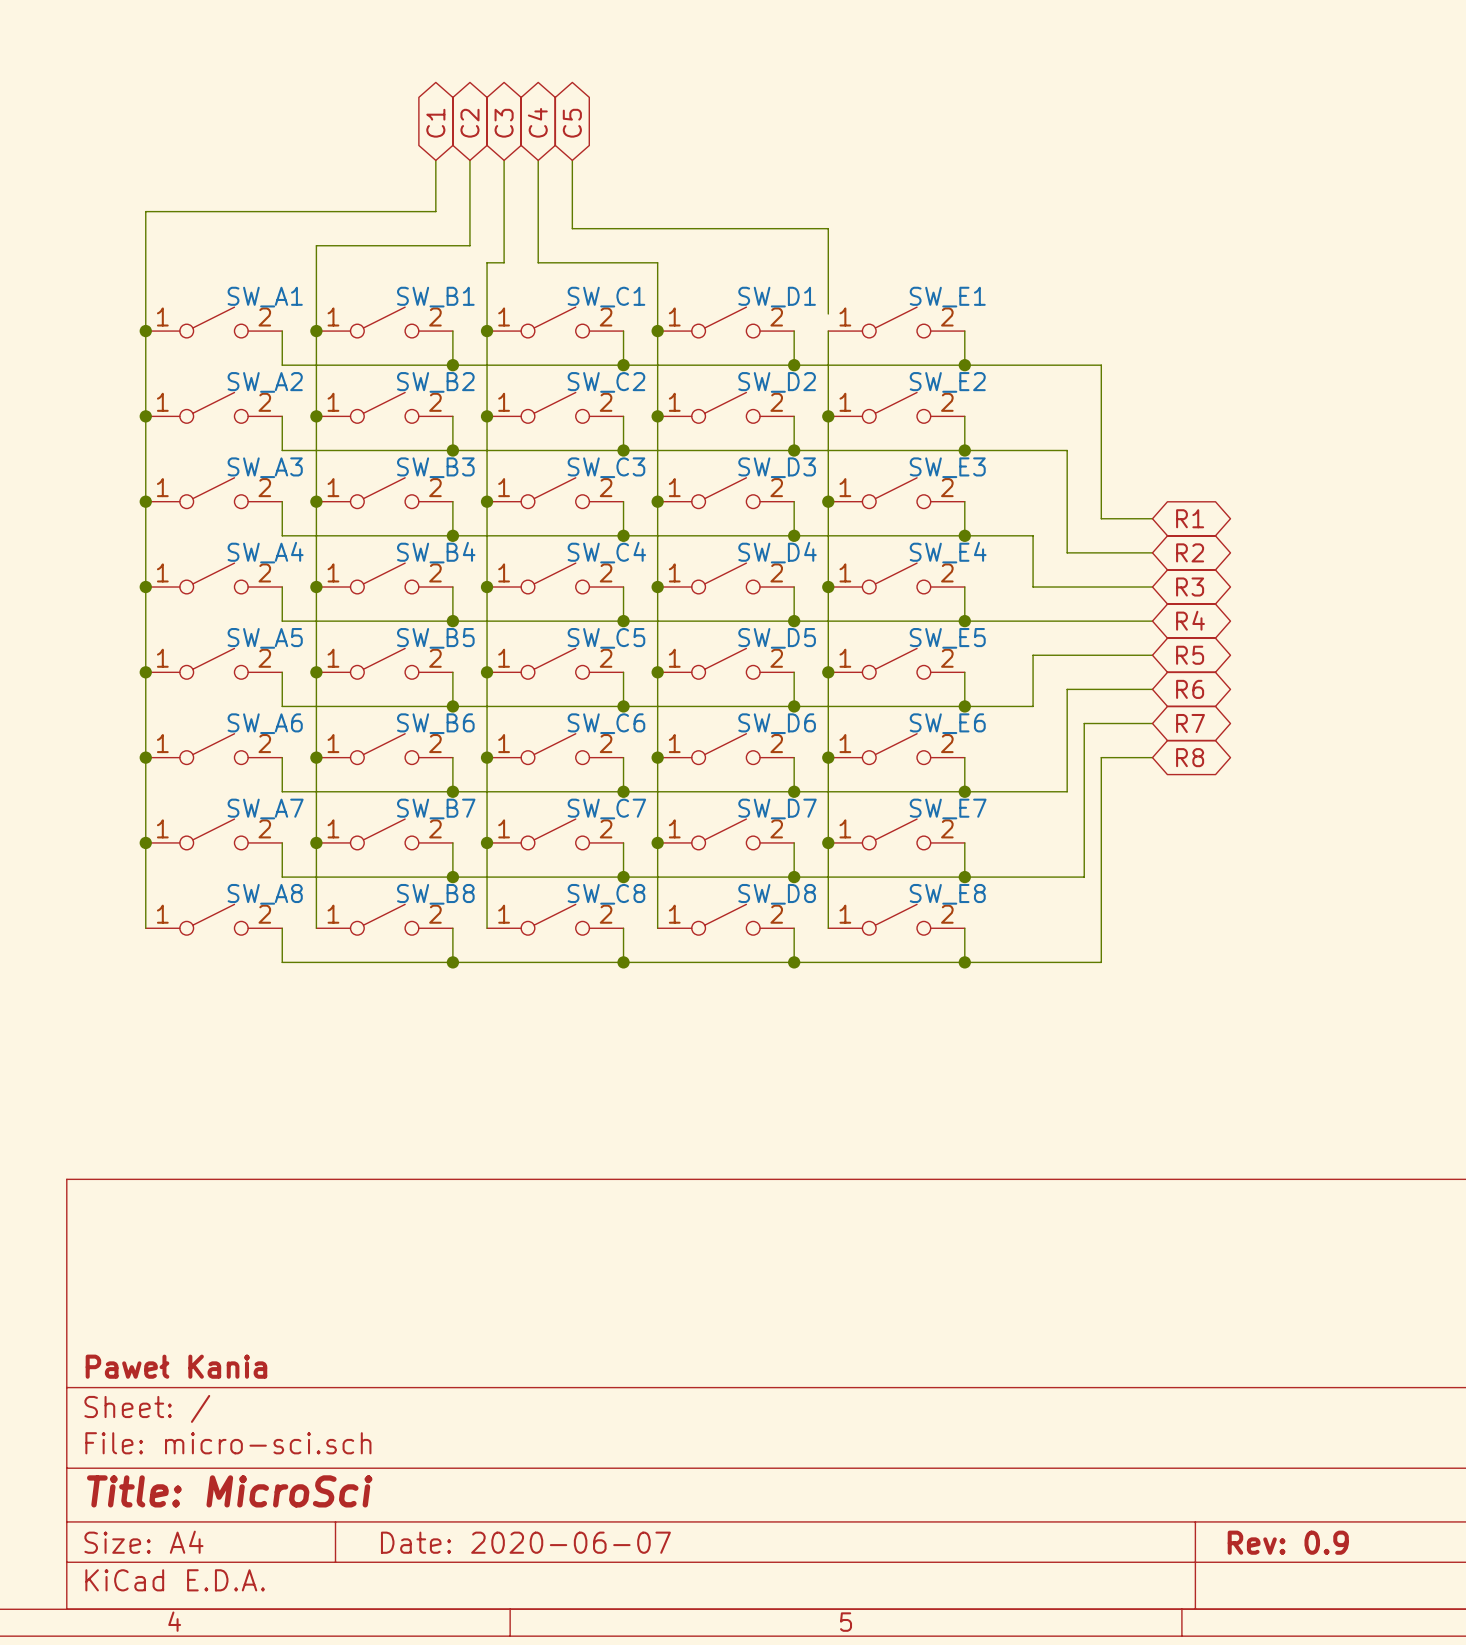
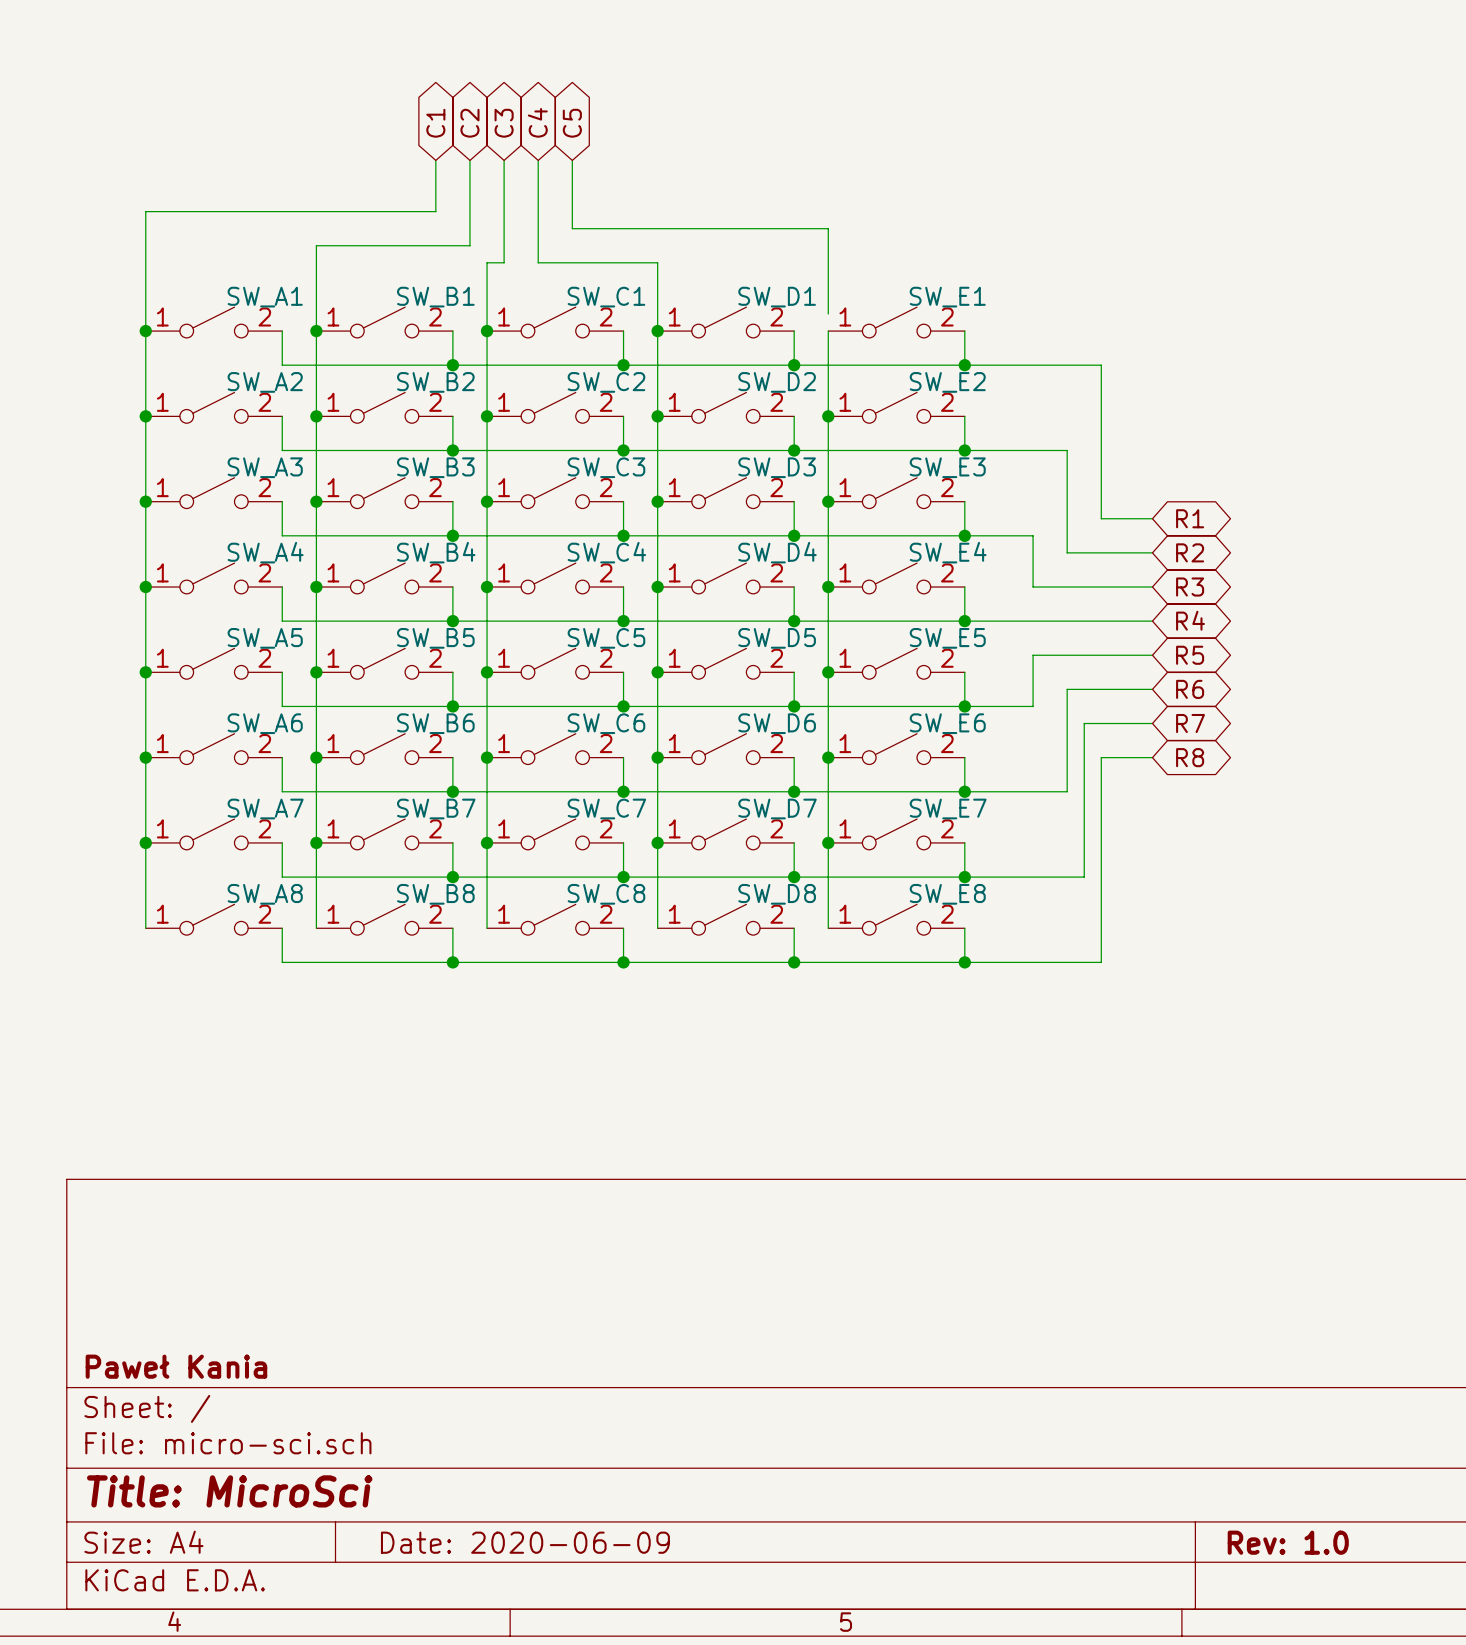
title block: Date: 2020-06-07 (525, 1542) -> Date: 2020-06-09 (525, 1542)
title block: Rev: 0.9 (1288, 1542) -> Rev: 1.0 (1288, 1542)

